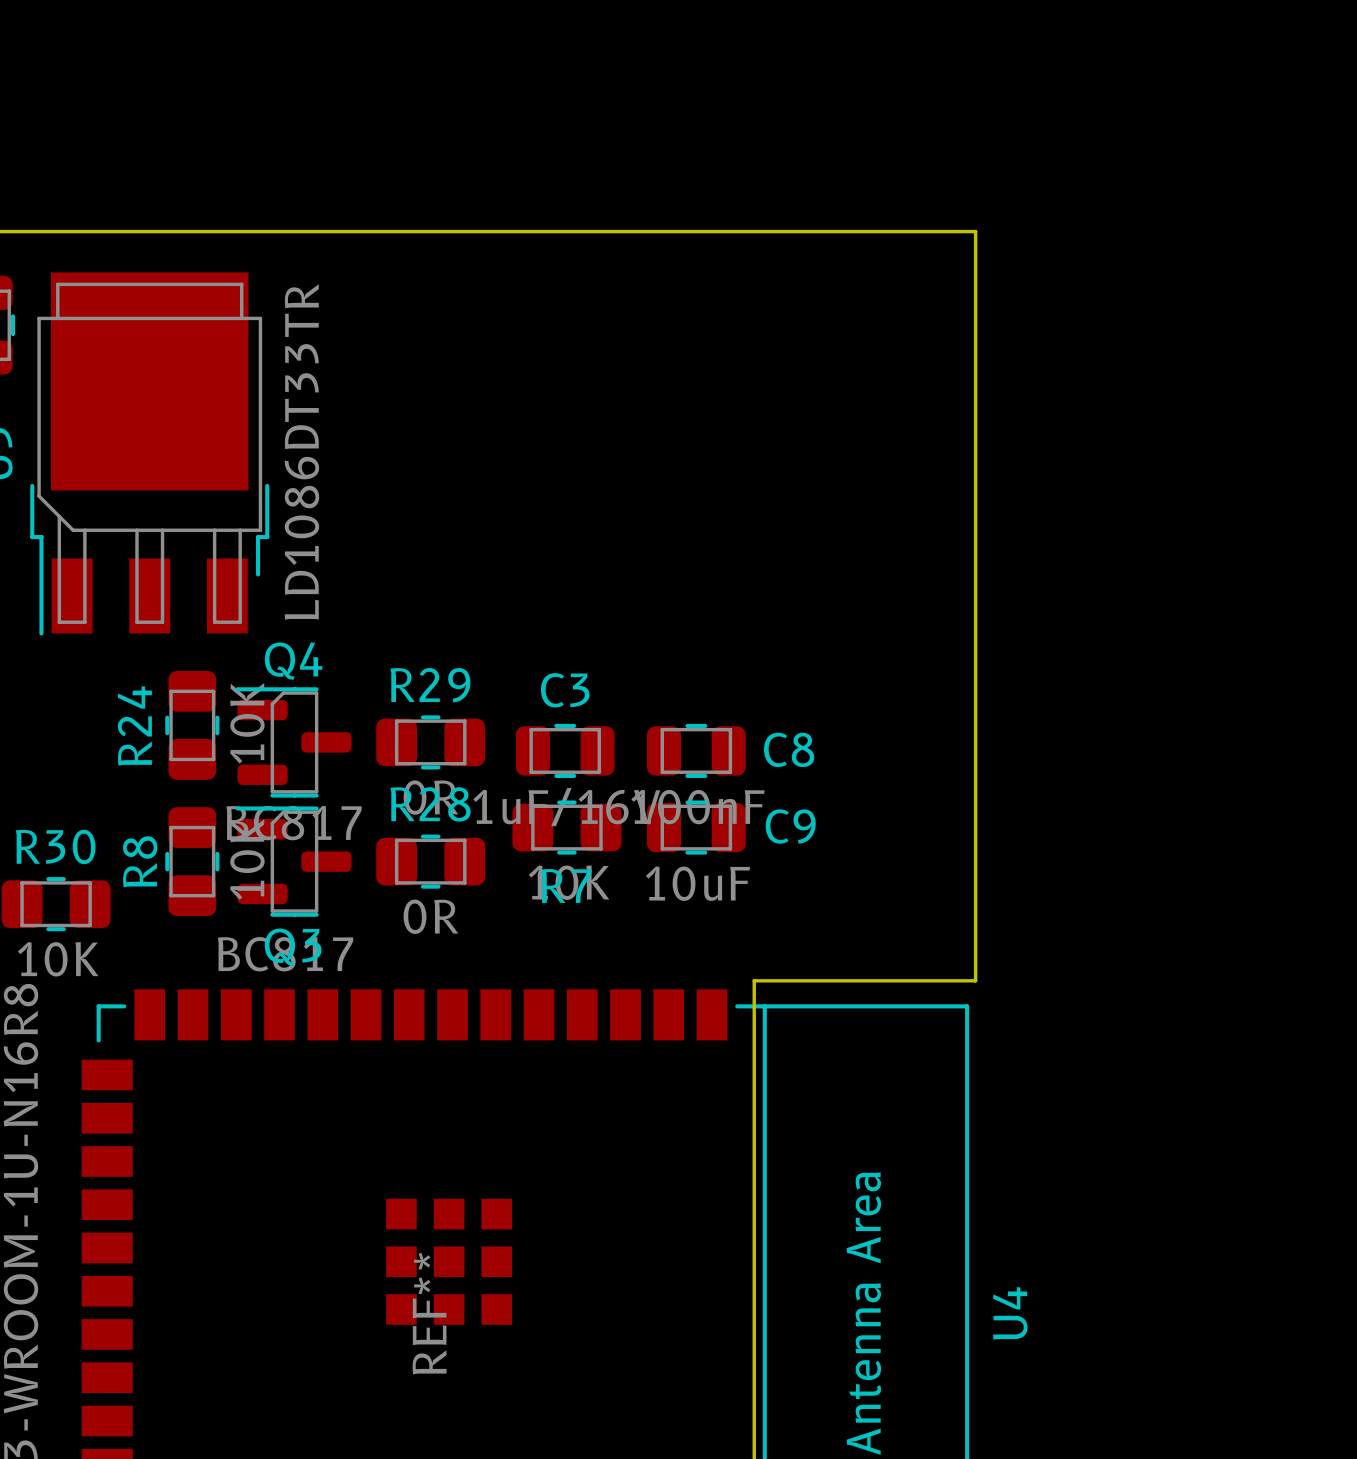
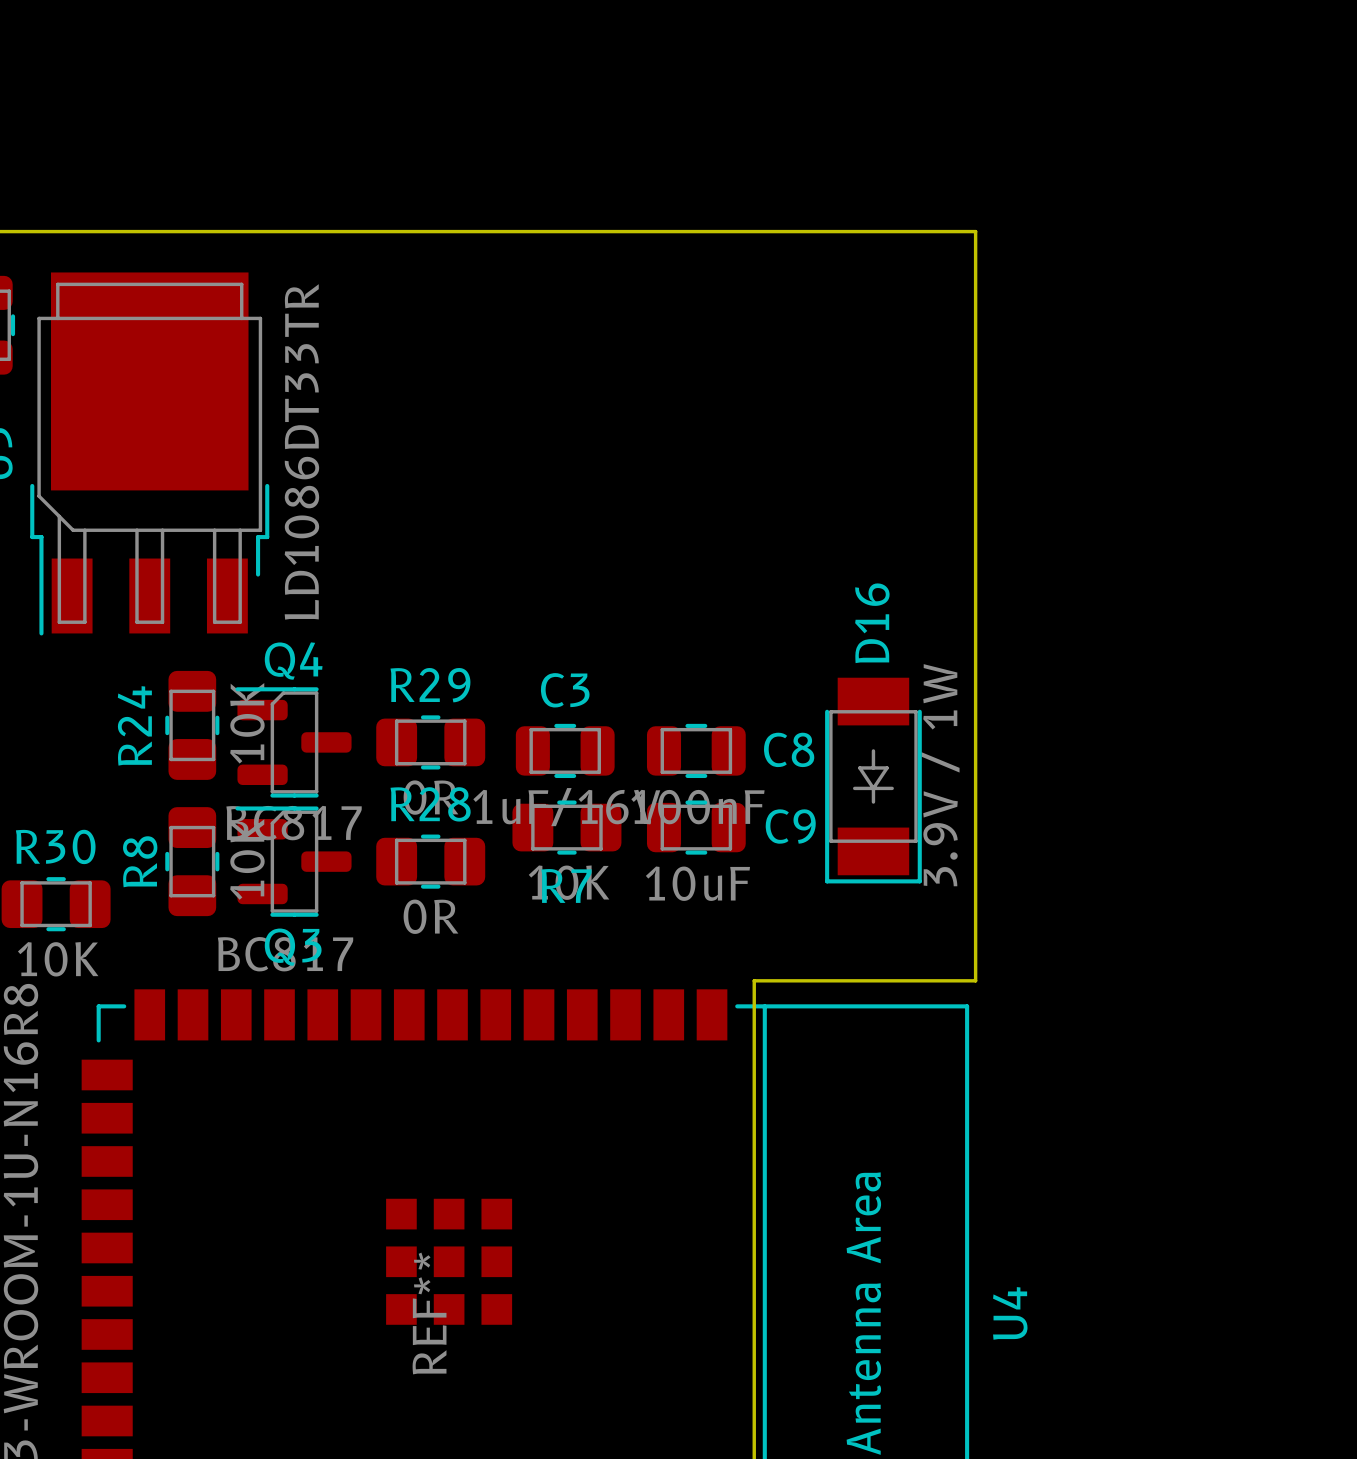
D16: none -> 3.9V / 1W (873, 780)

